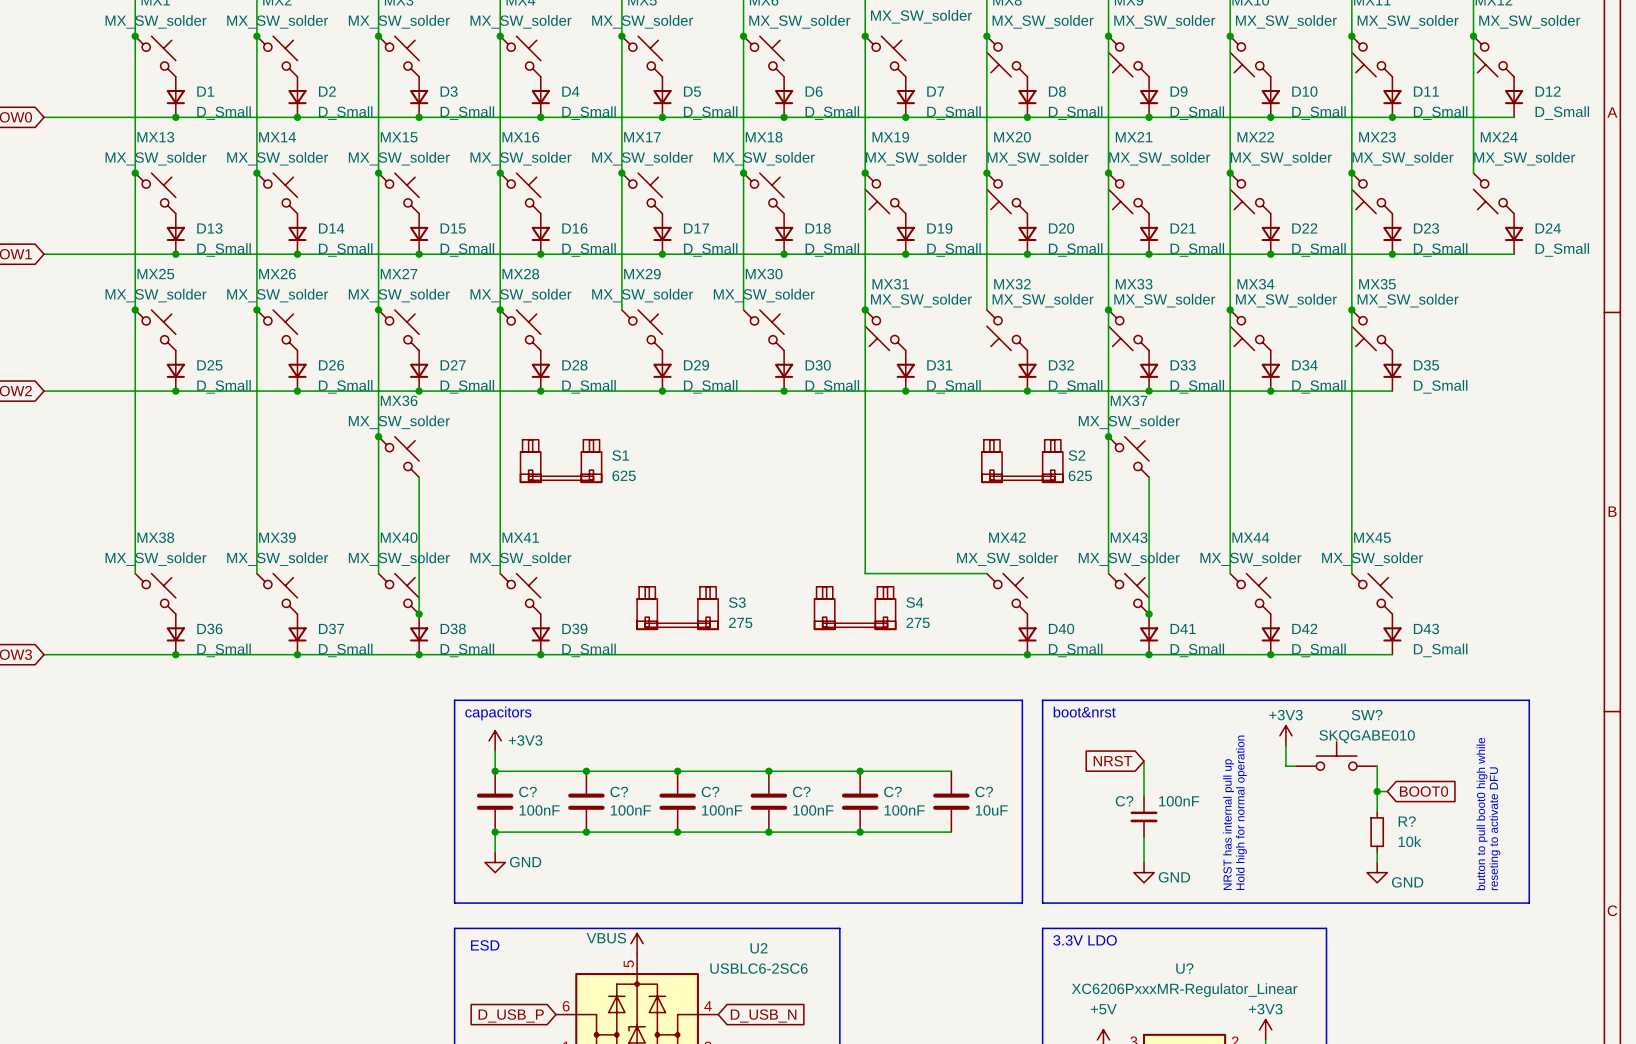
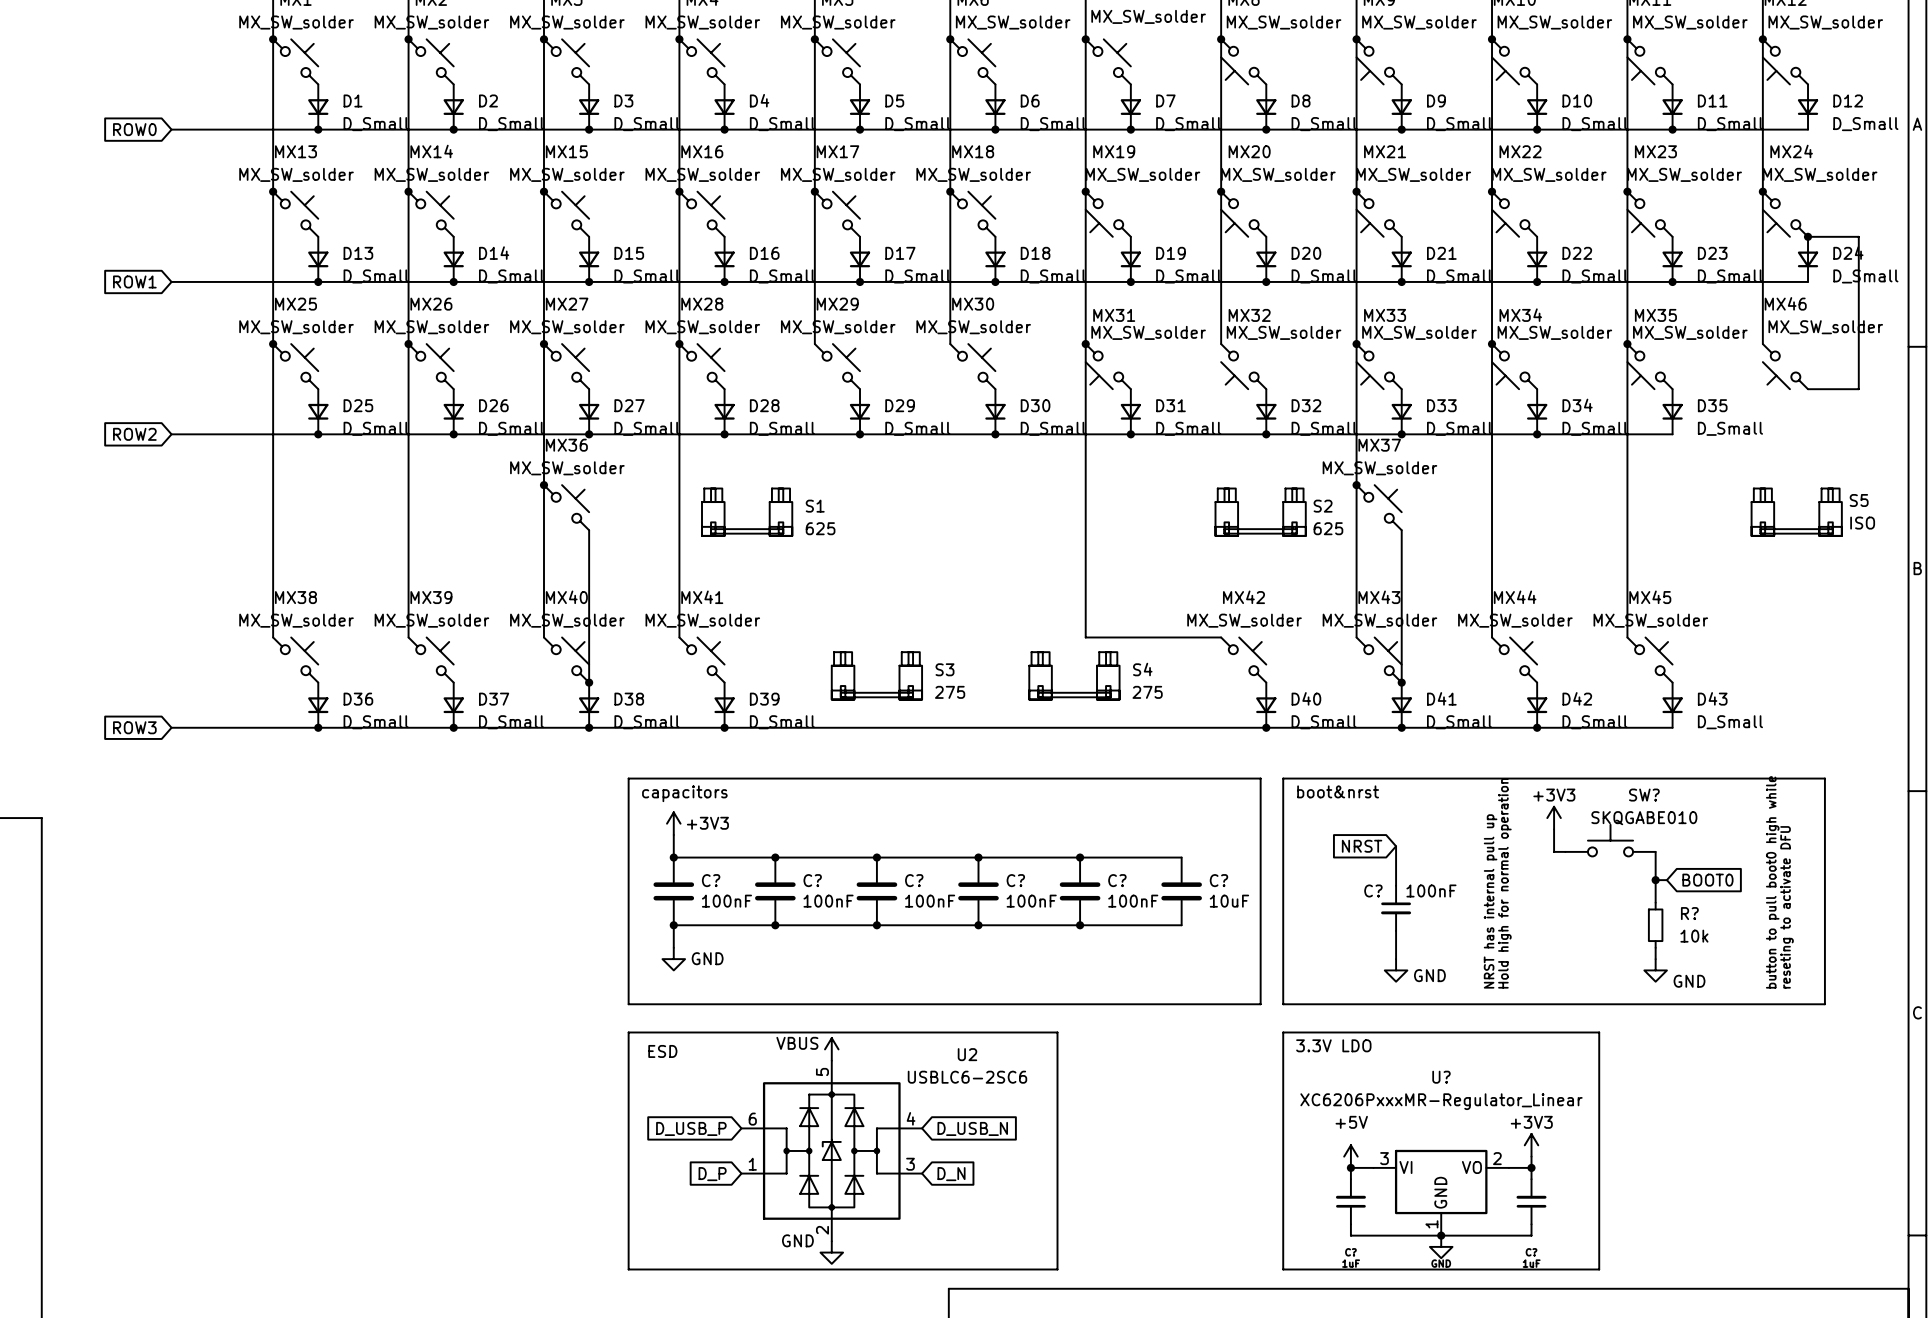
wire: none -> (1762, 191) (1762, 344)
junction: none -> (1762, 191)
wire: none -> (1808, 236) (1858, 236) (1858, 389) (1808, 389)
junction: none -> (1808, 236)
MX46: none -> MX_SW_solder (1785, 366)
S5: none -> ISO (1796, 512)

